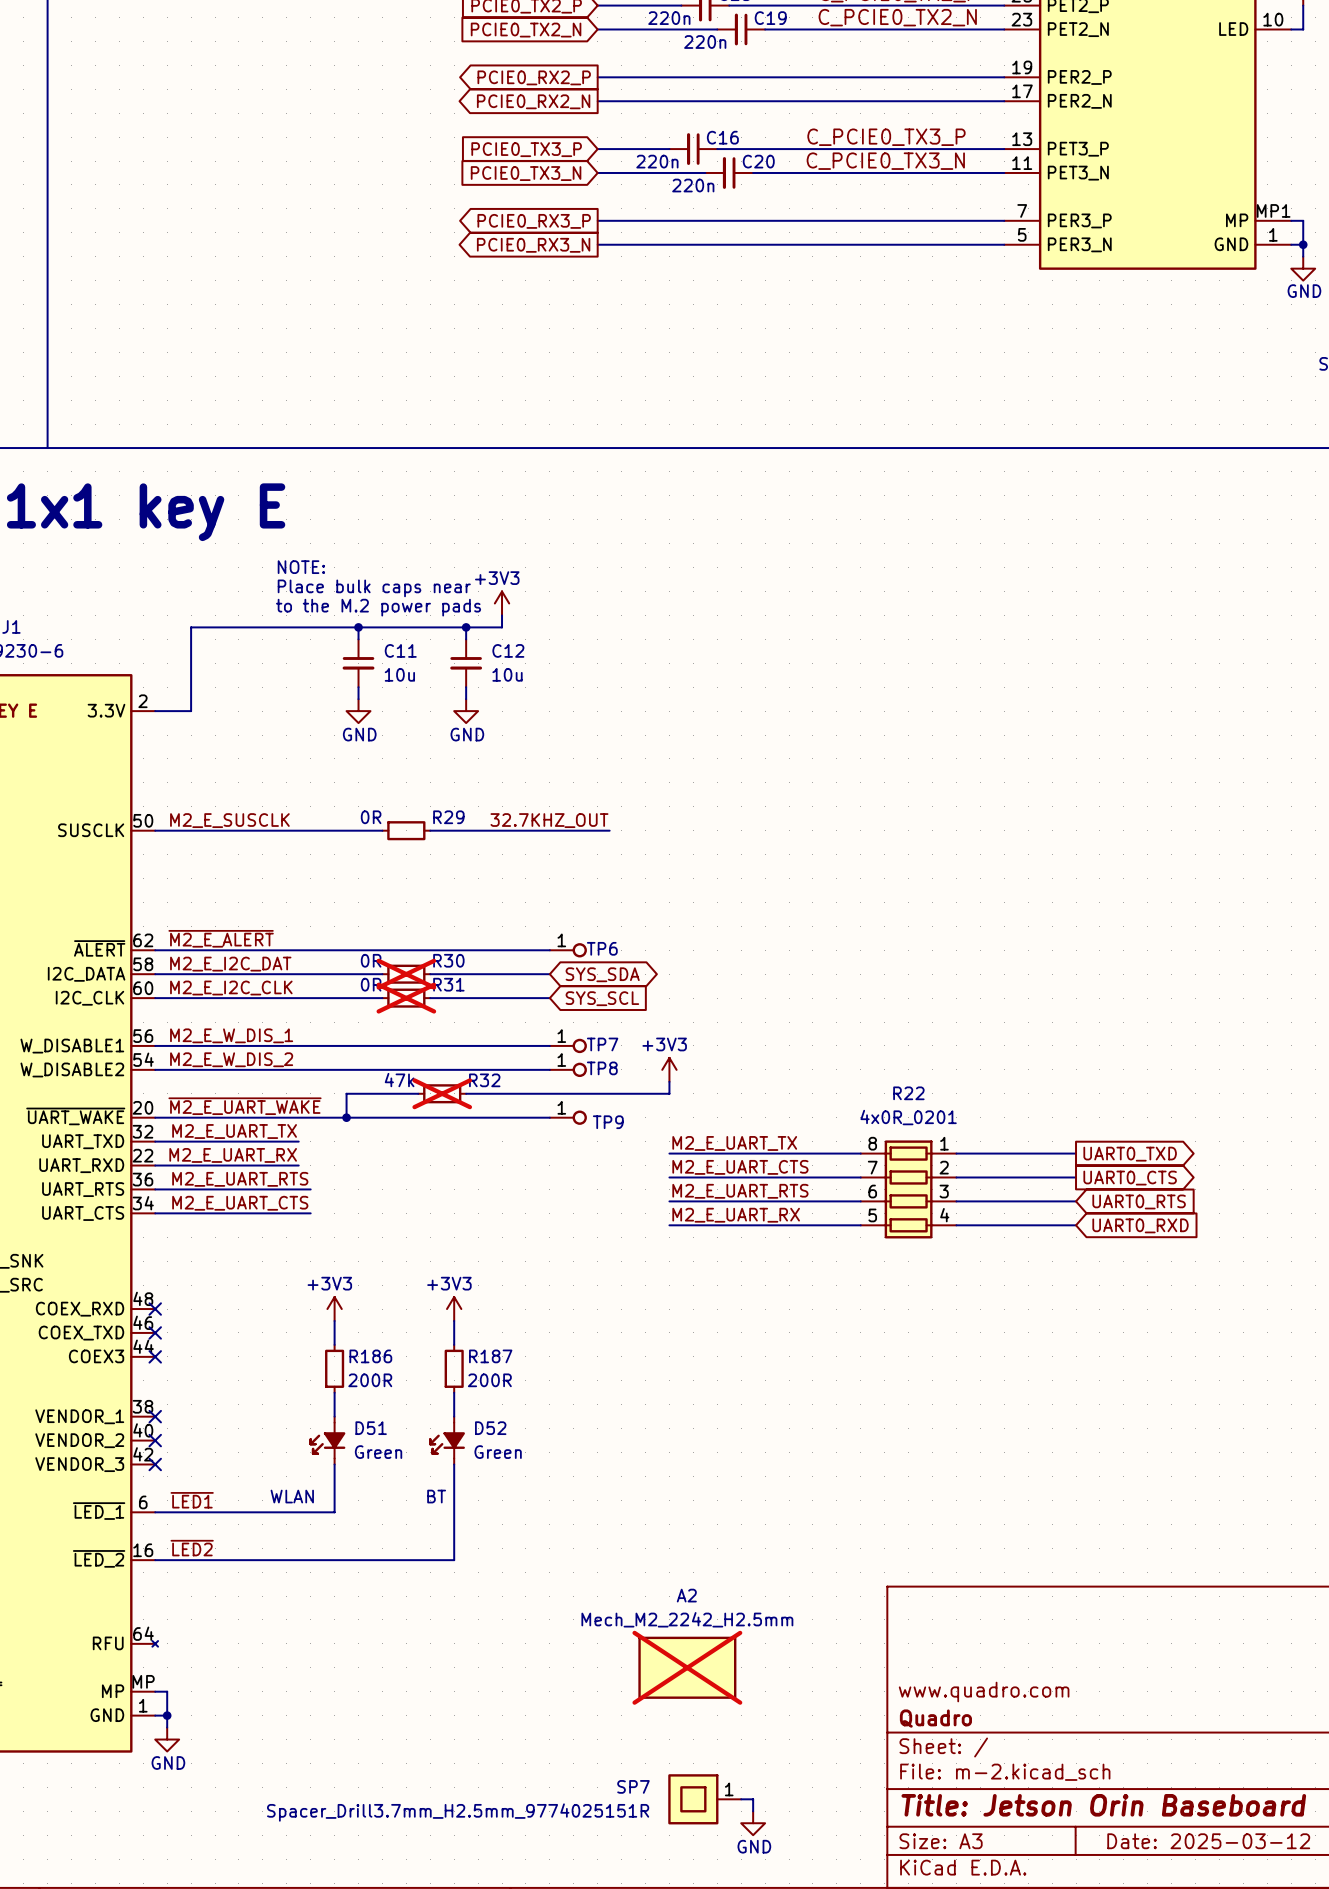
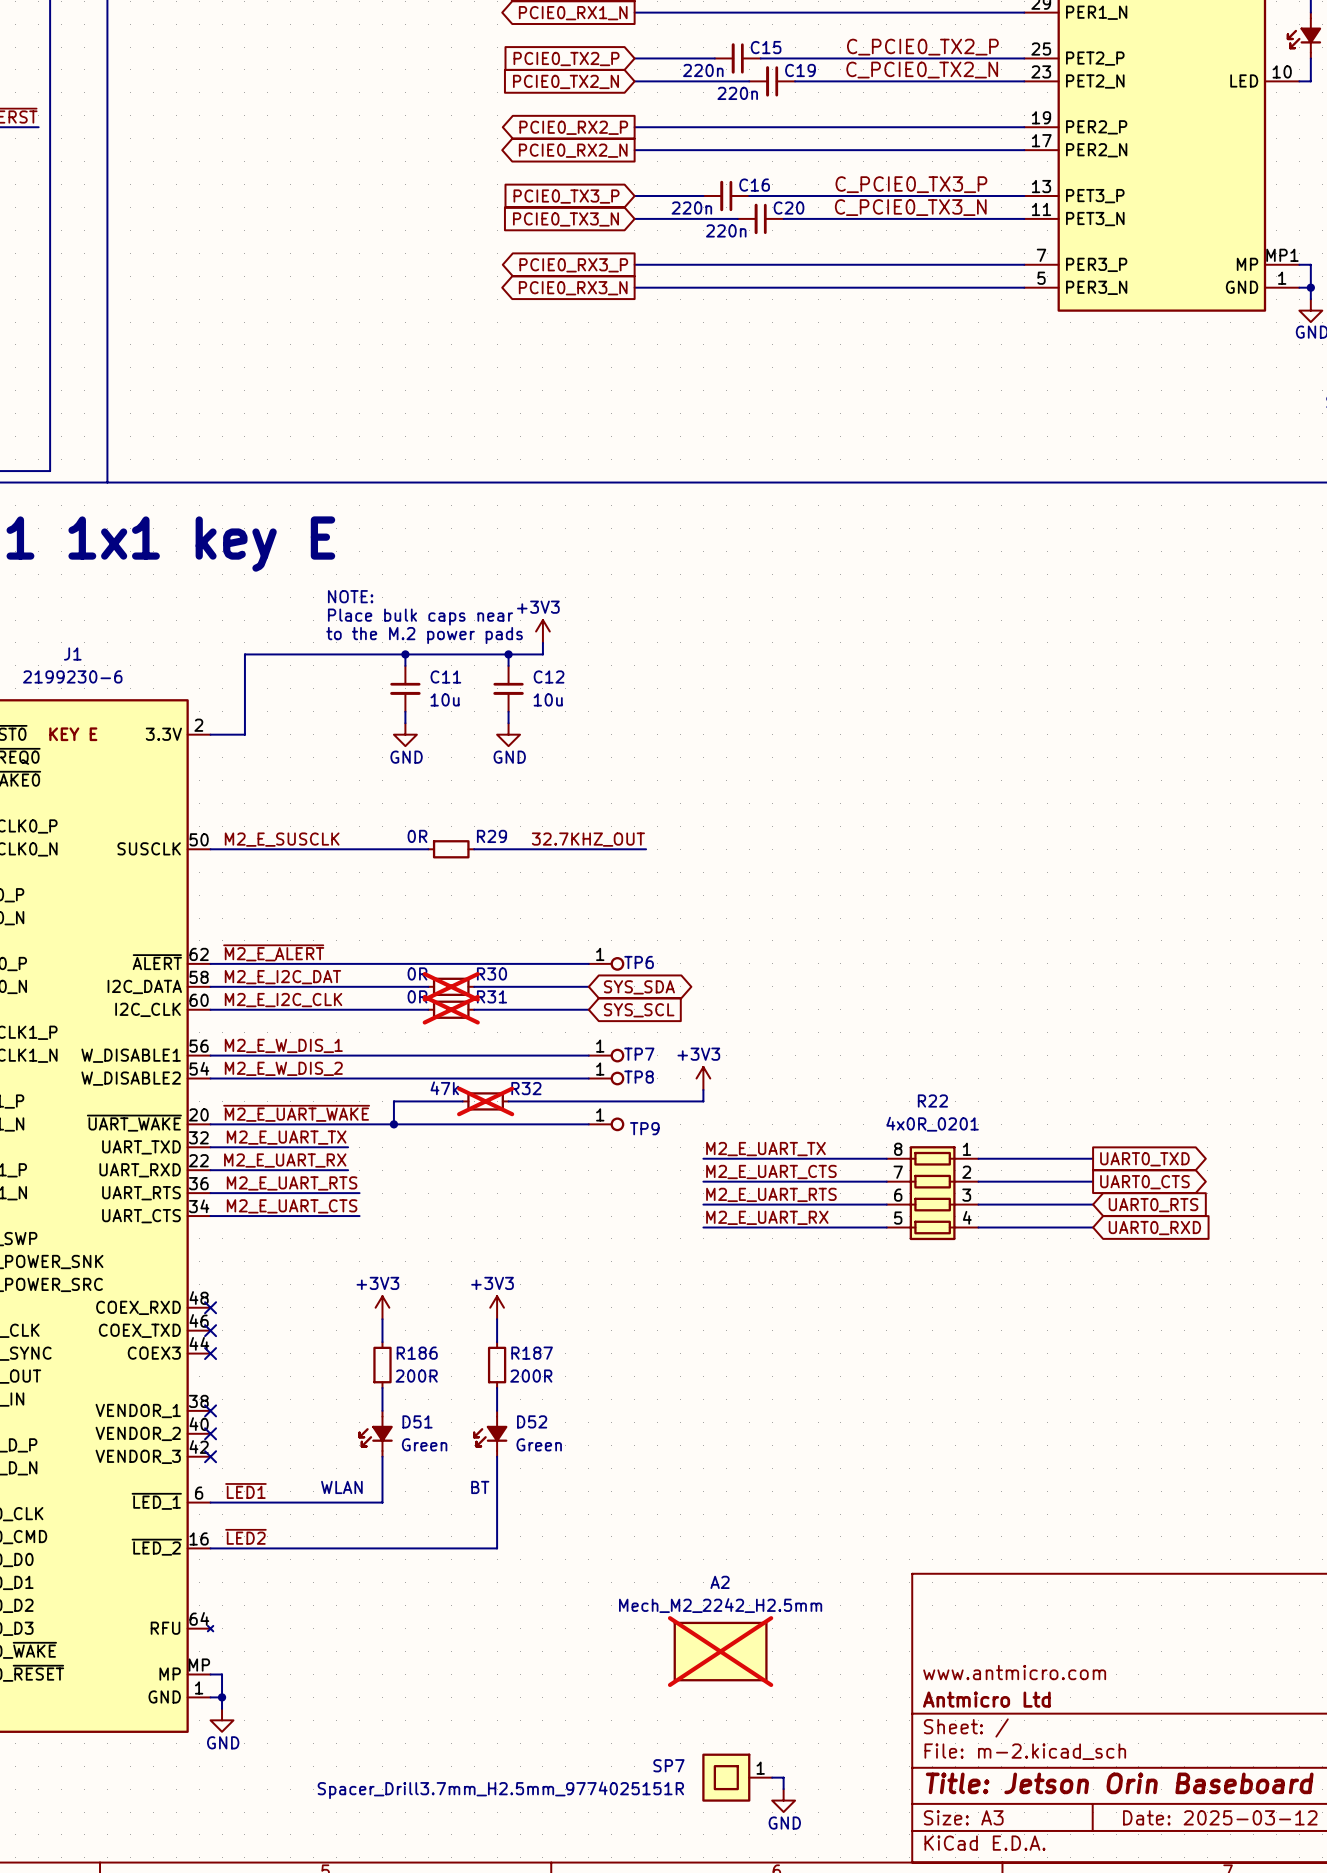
title block: www.quadro.com (984, 1692) -> www.antmicro.com (1014, 1672)
title block: Quadro (935, 1718) -> Antmicro Ltd (986, 1699)

